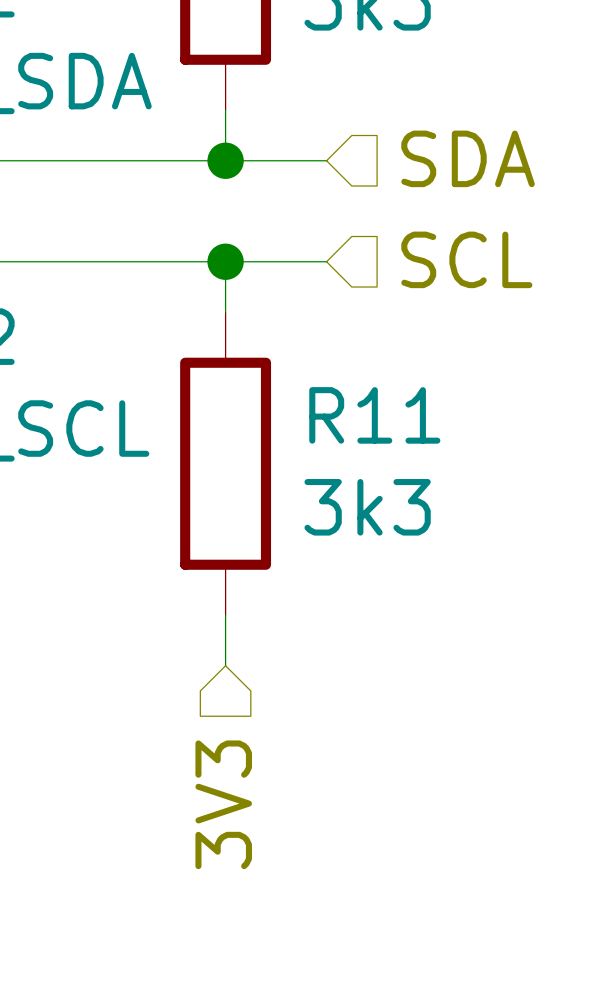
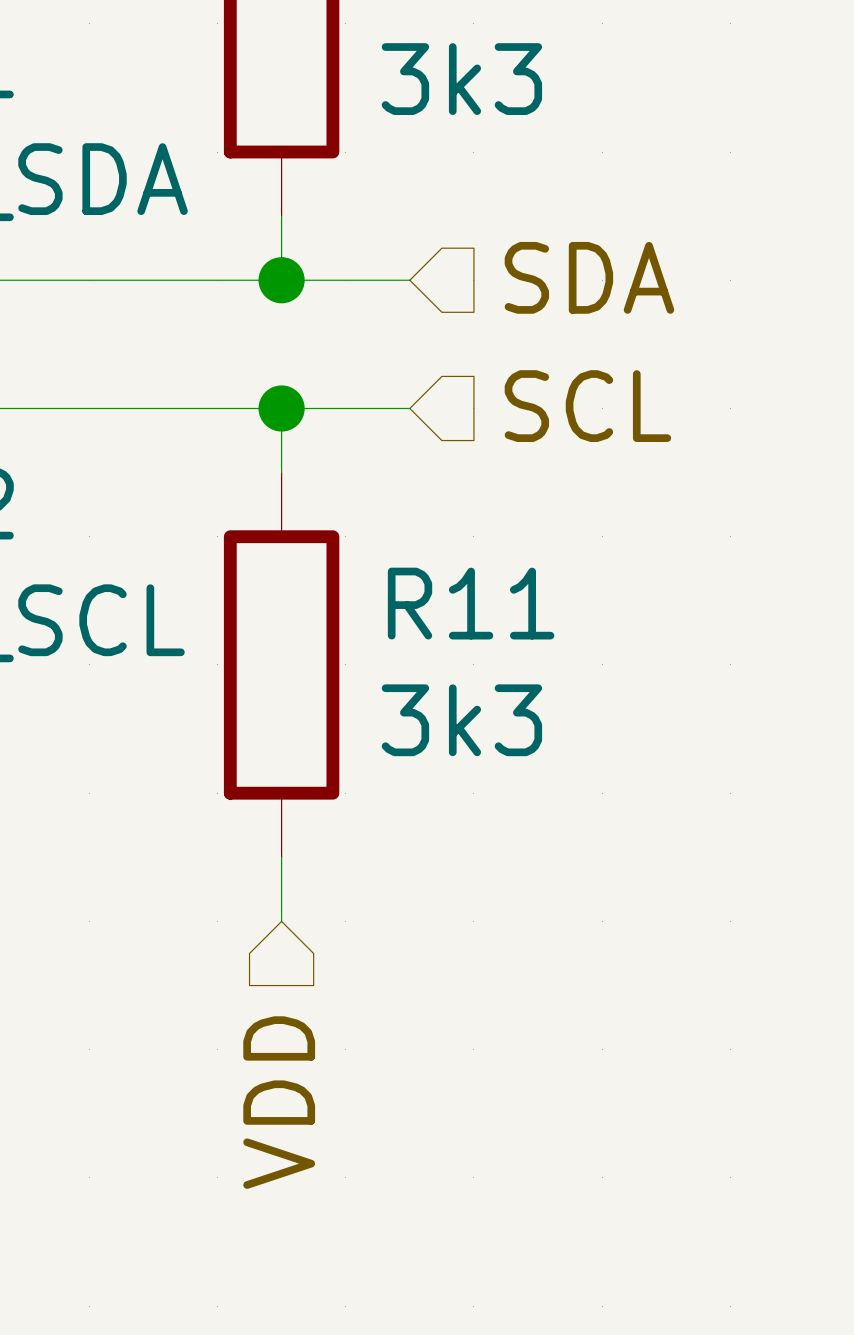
hierarchical label: 3V3 (223, 804) -> VDD (279, 1102)

